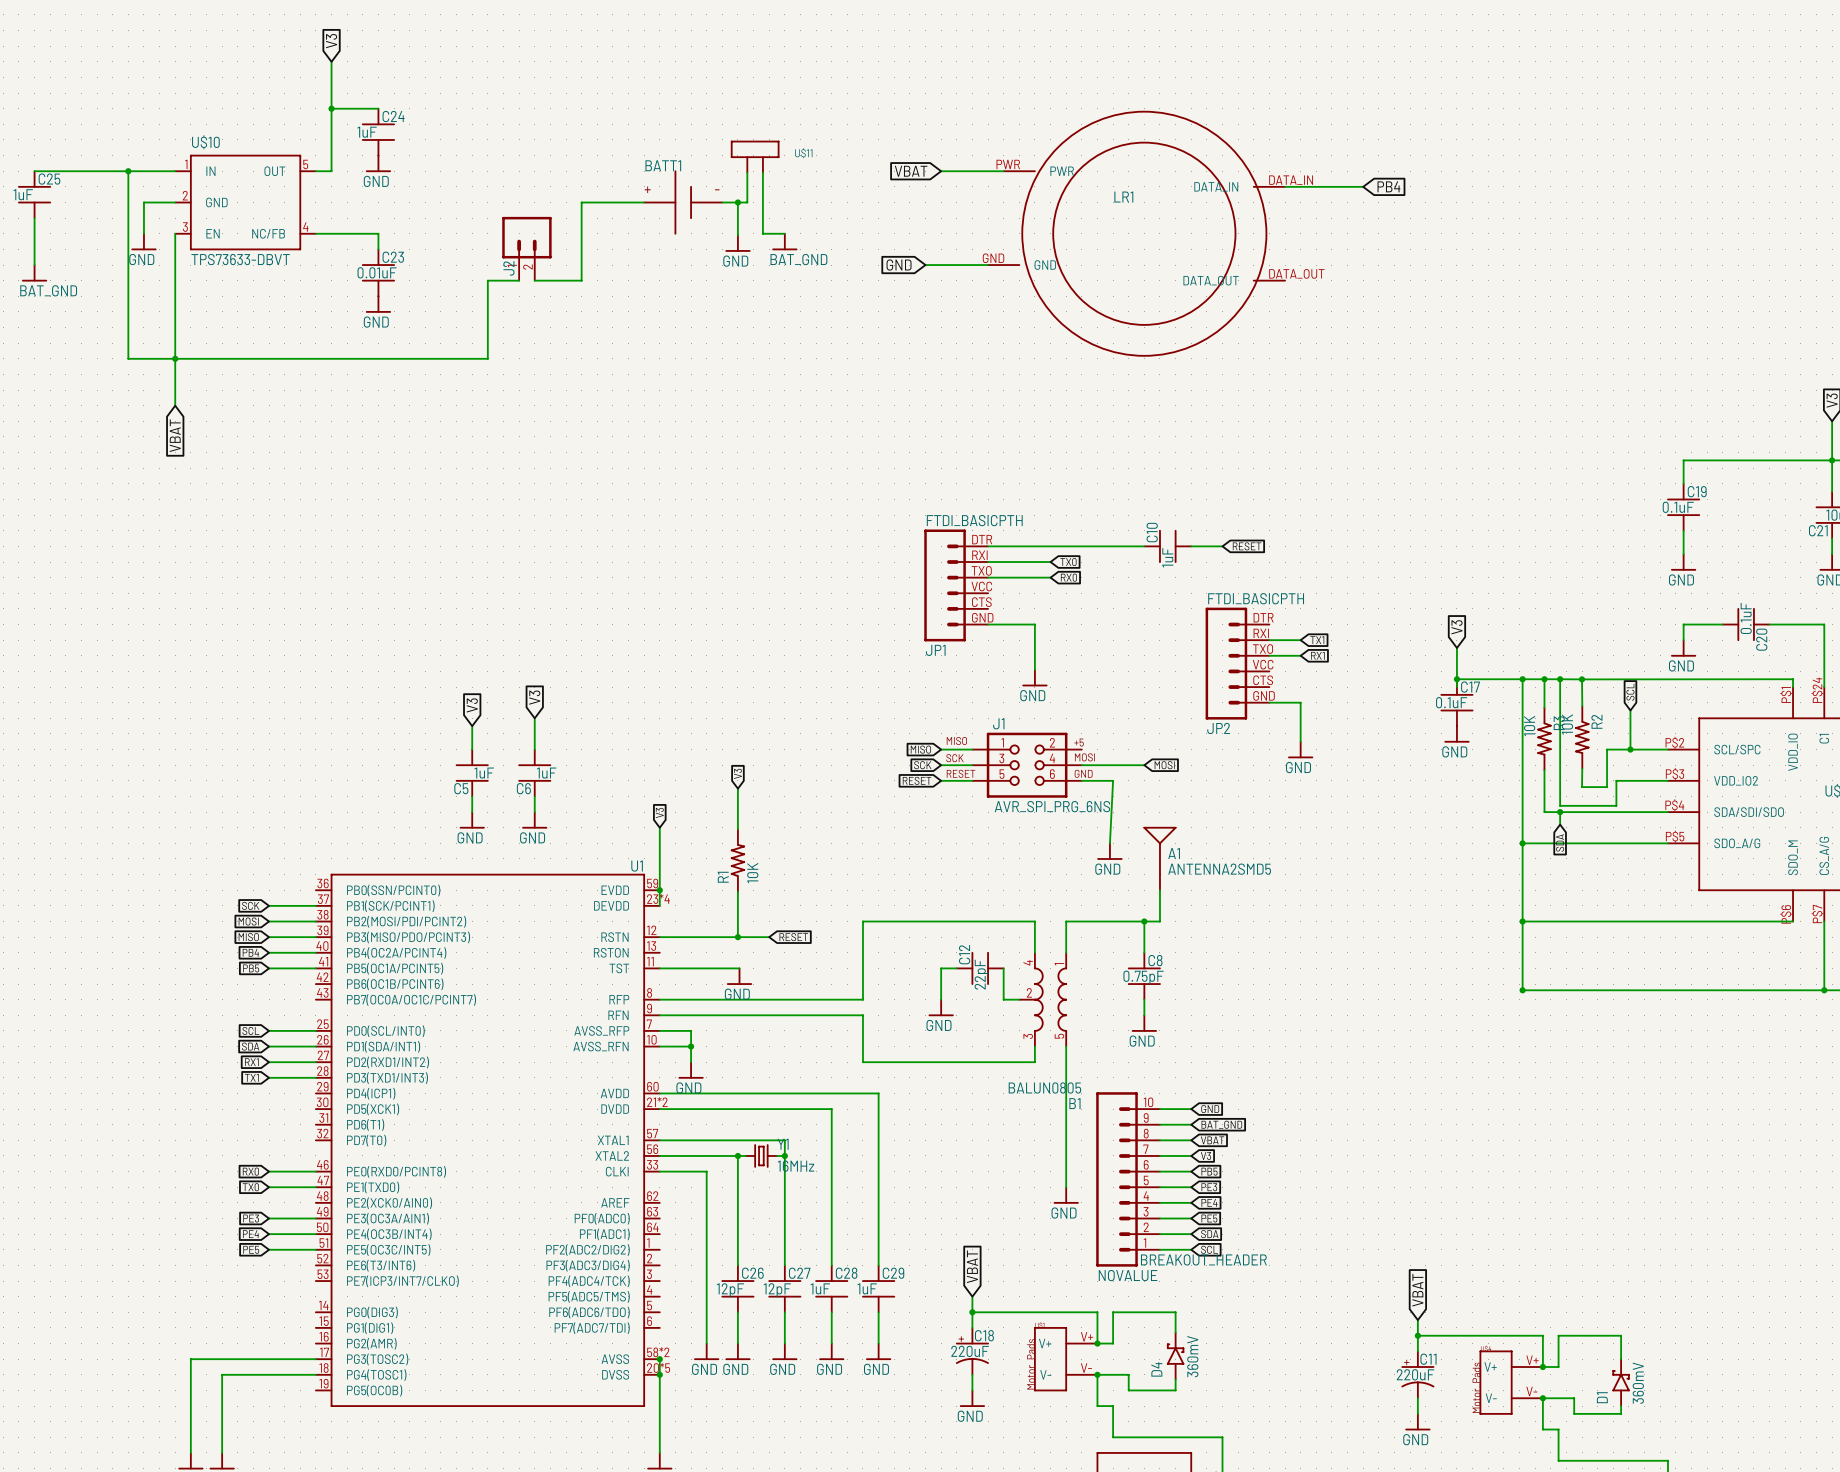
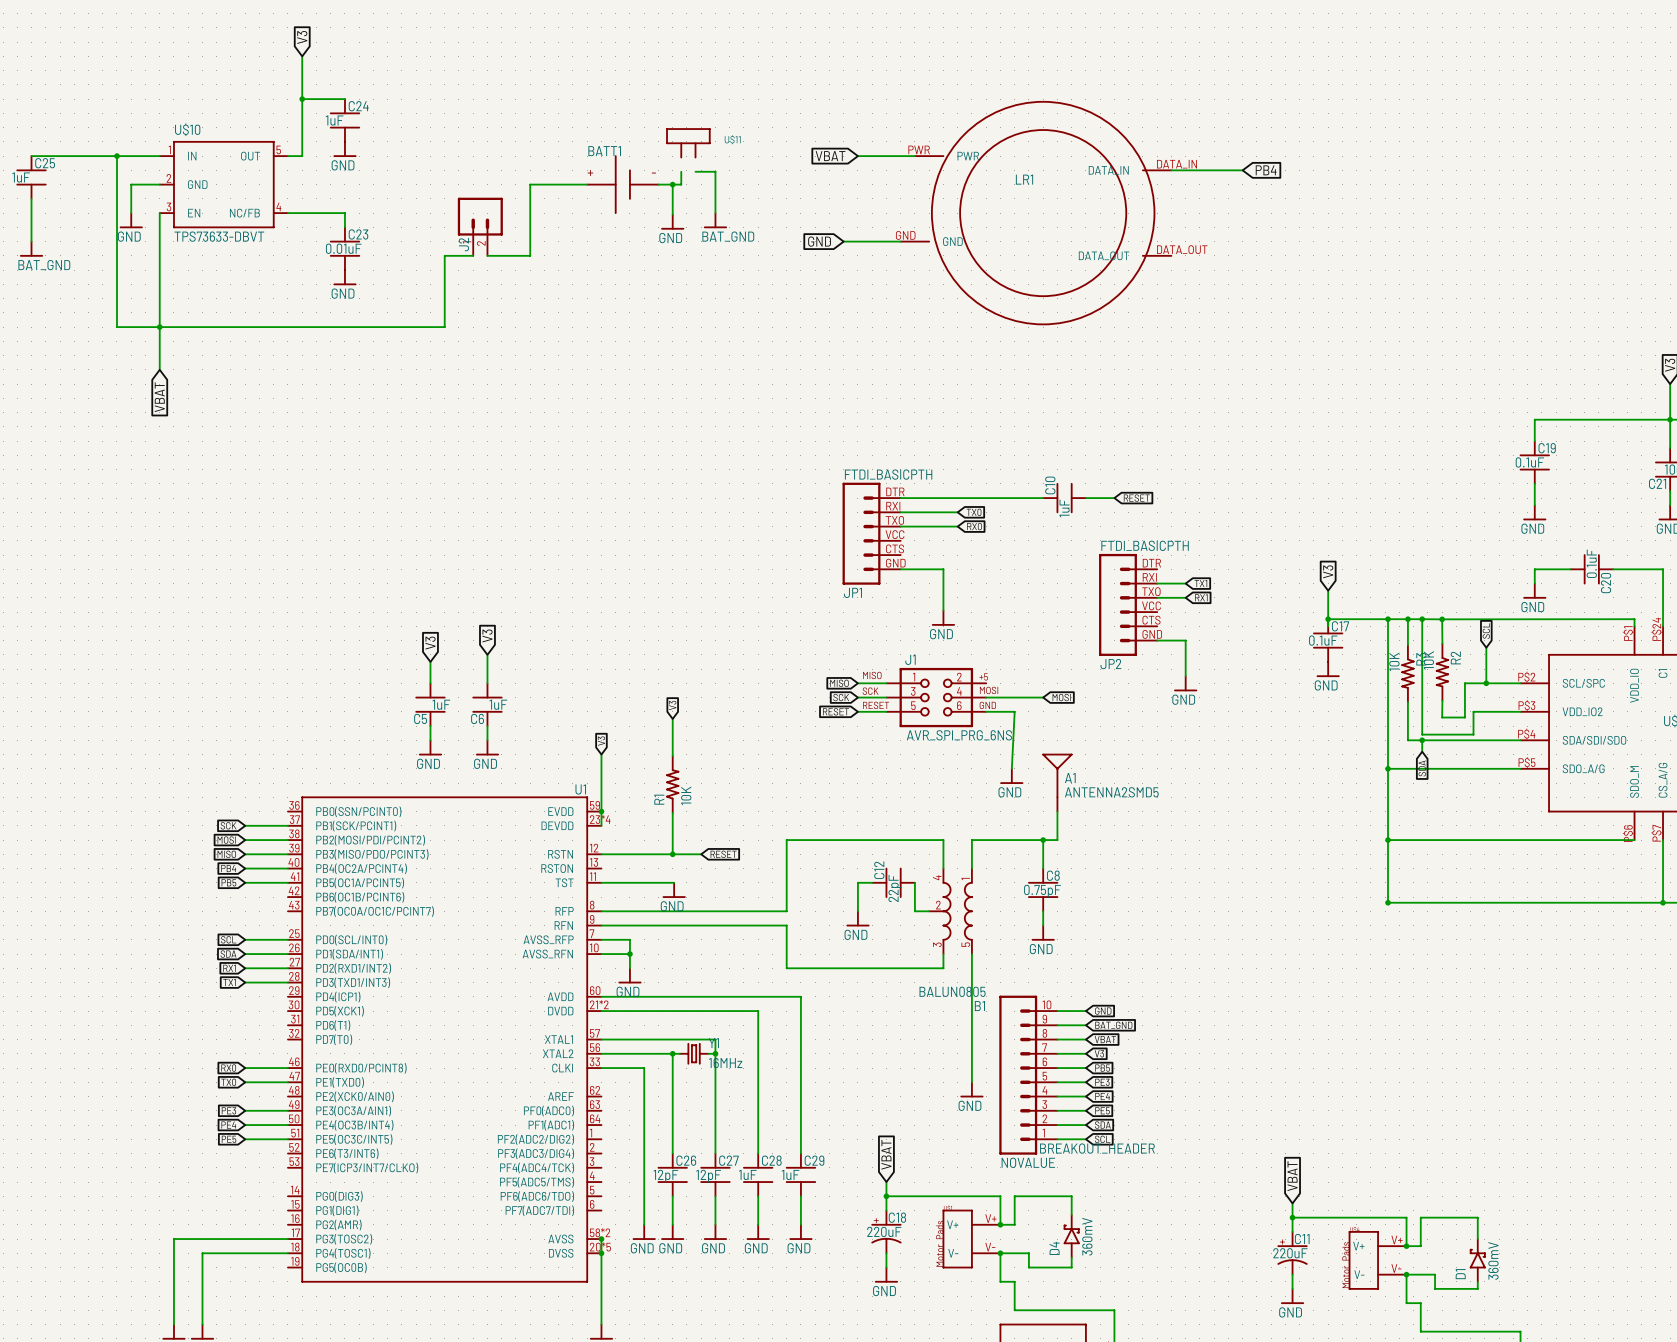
wire: (747, 172) (747, 188) -> none
wire: (762, 172) (762, 233) (784, 233) -> (695, 171) (715, 171) (715, 213)

